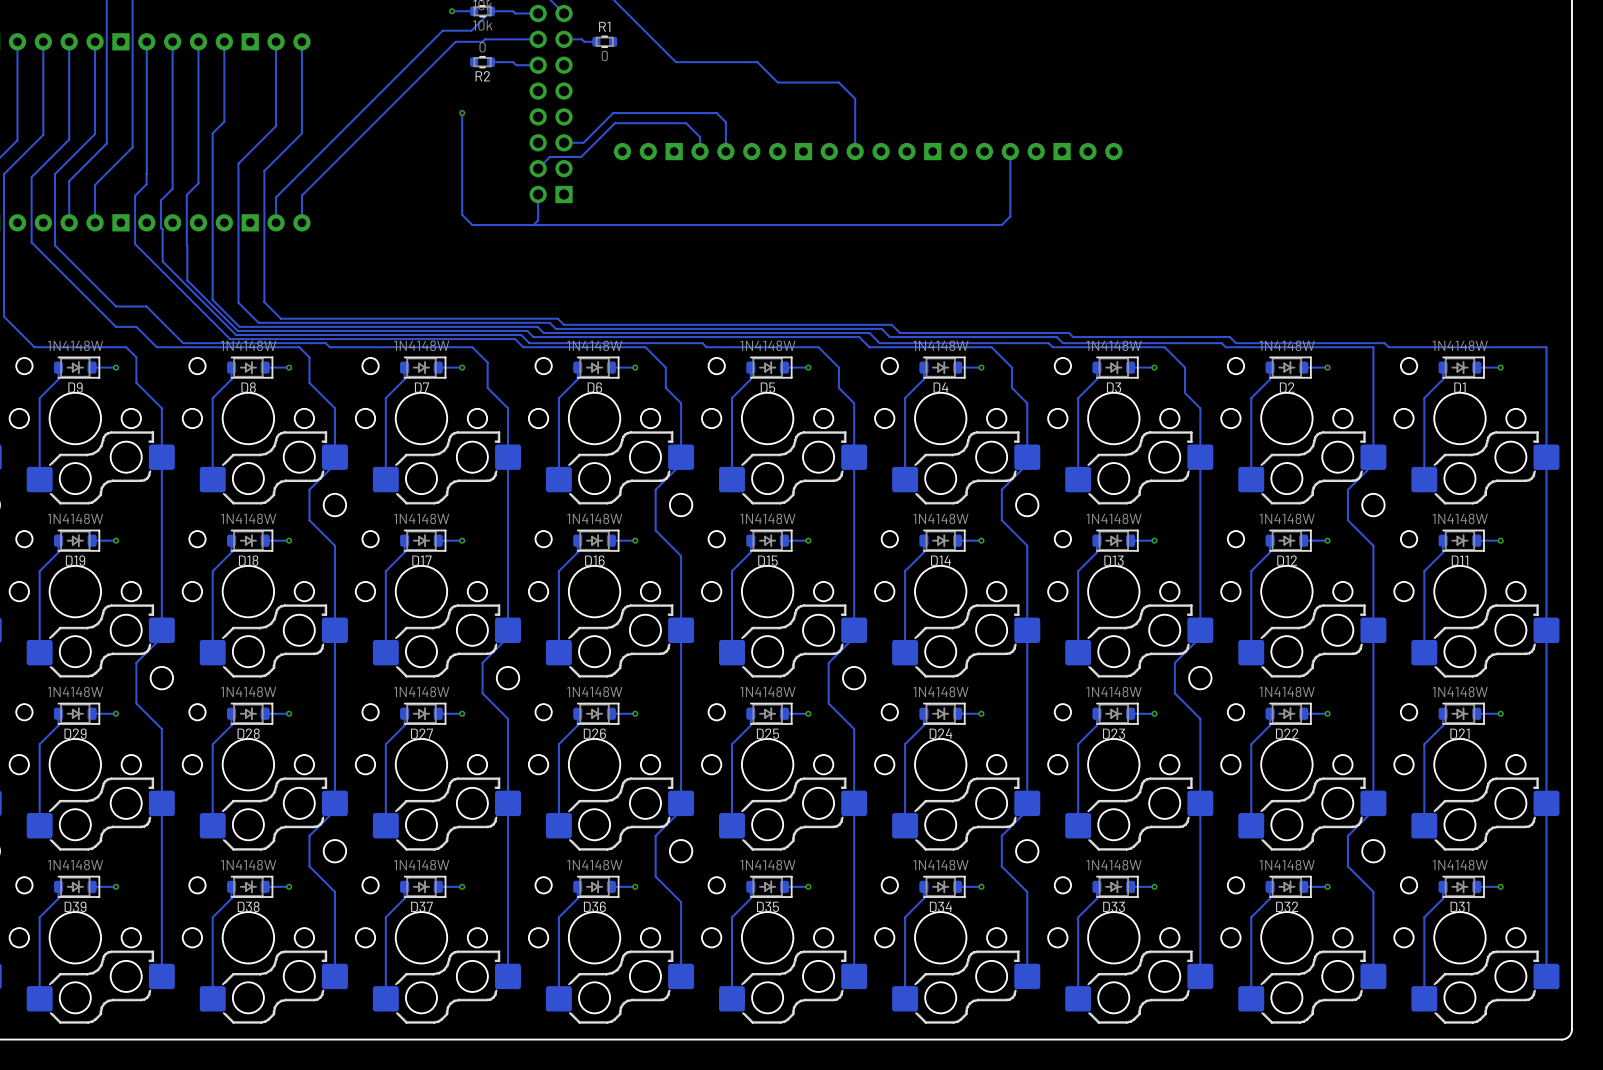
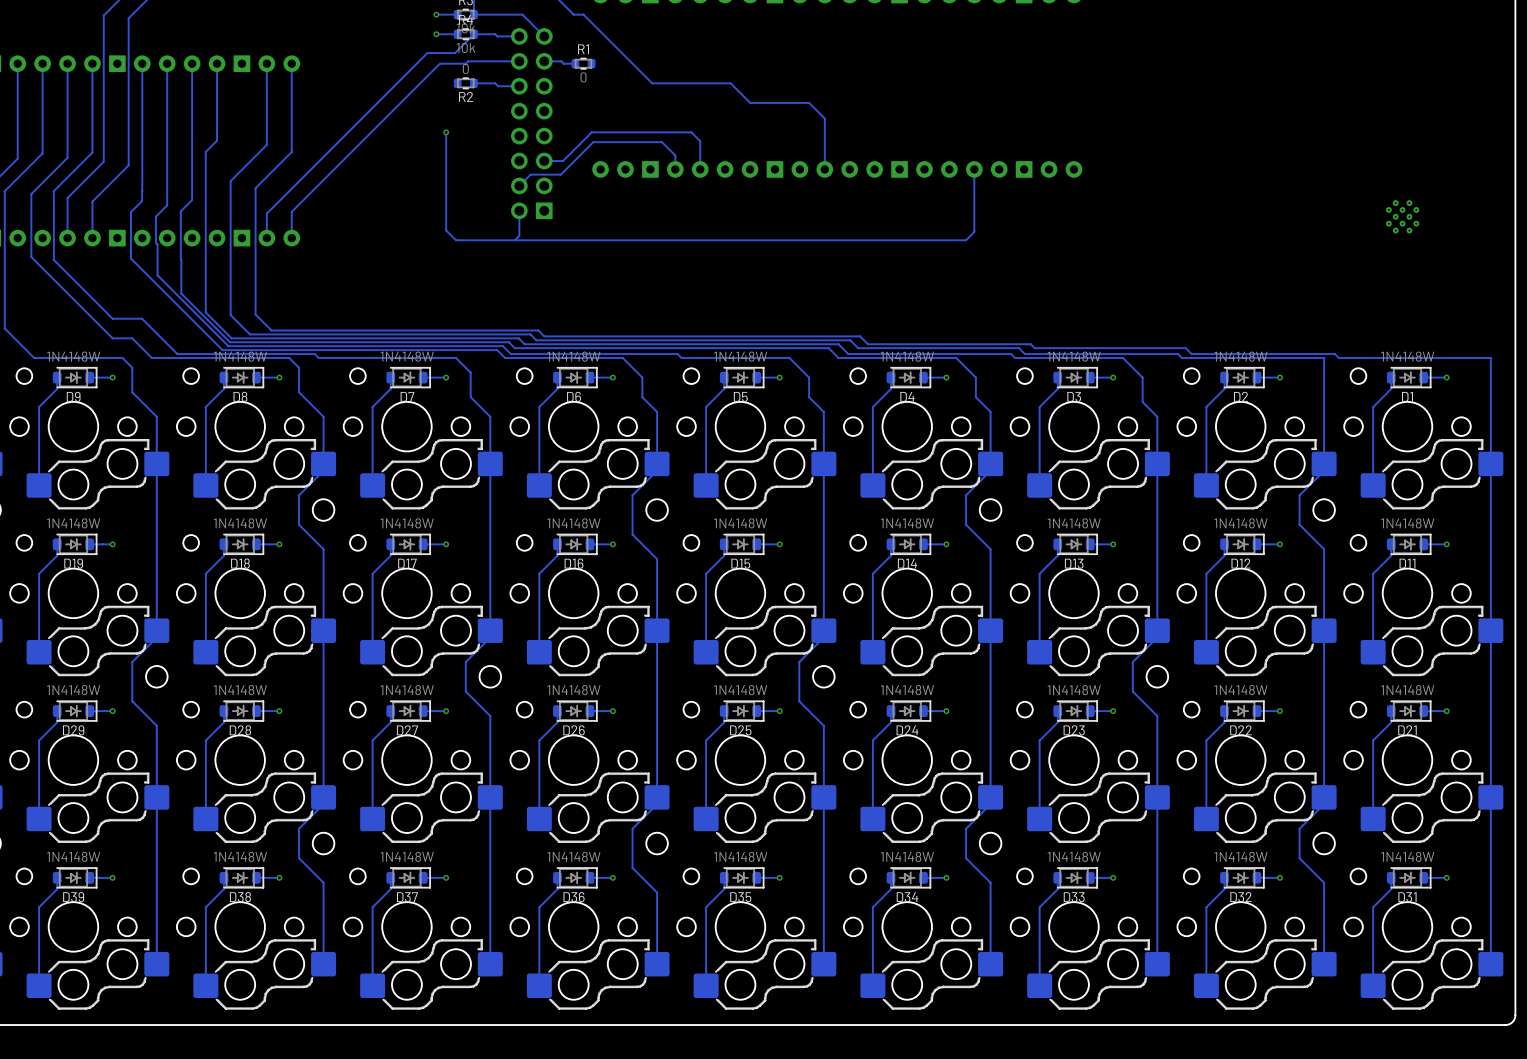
part: none -> (1402, 216)

